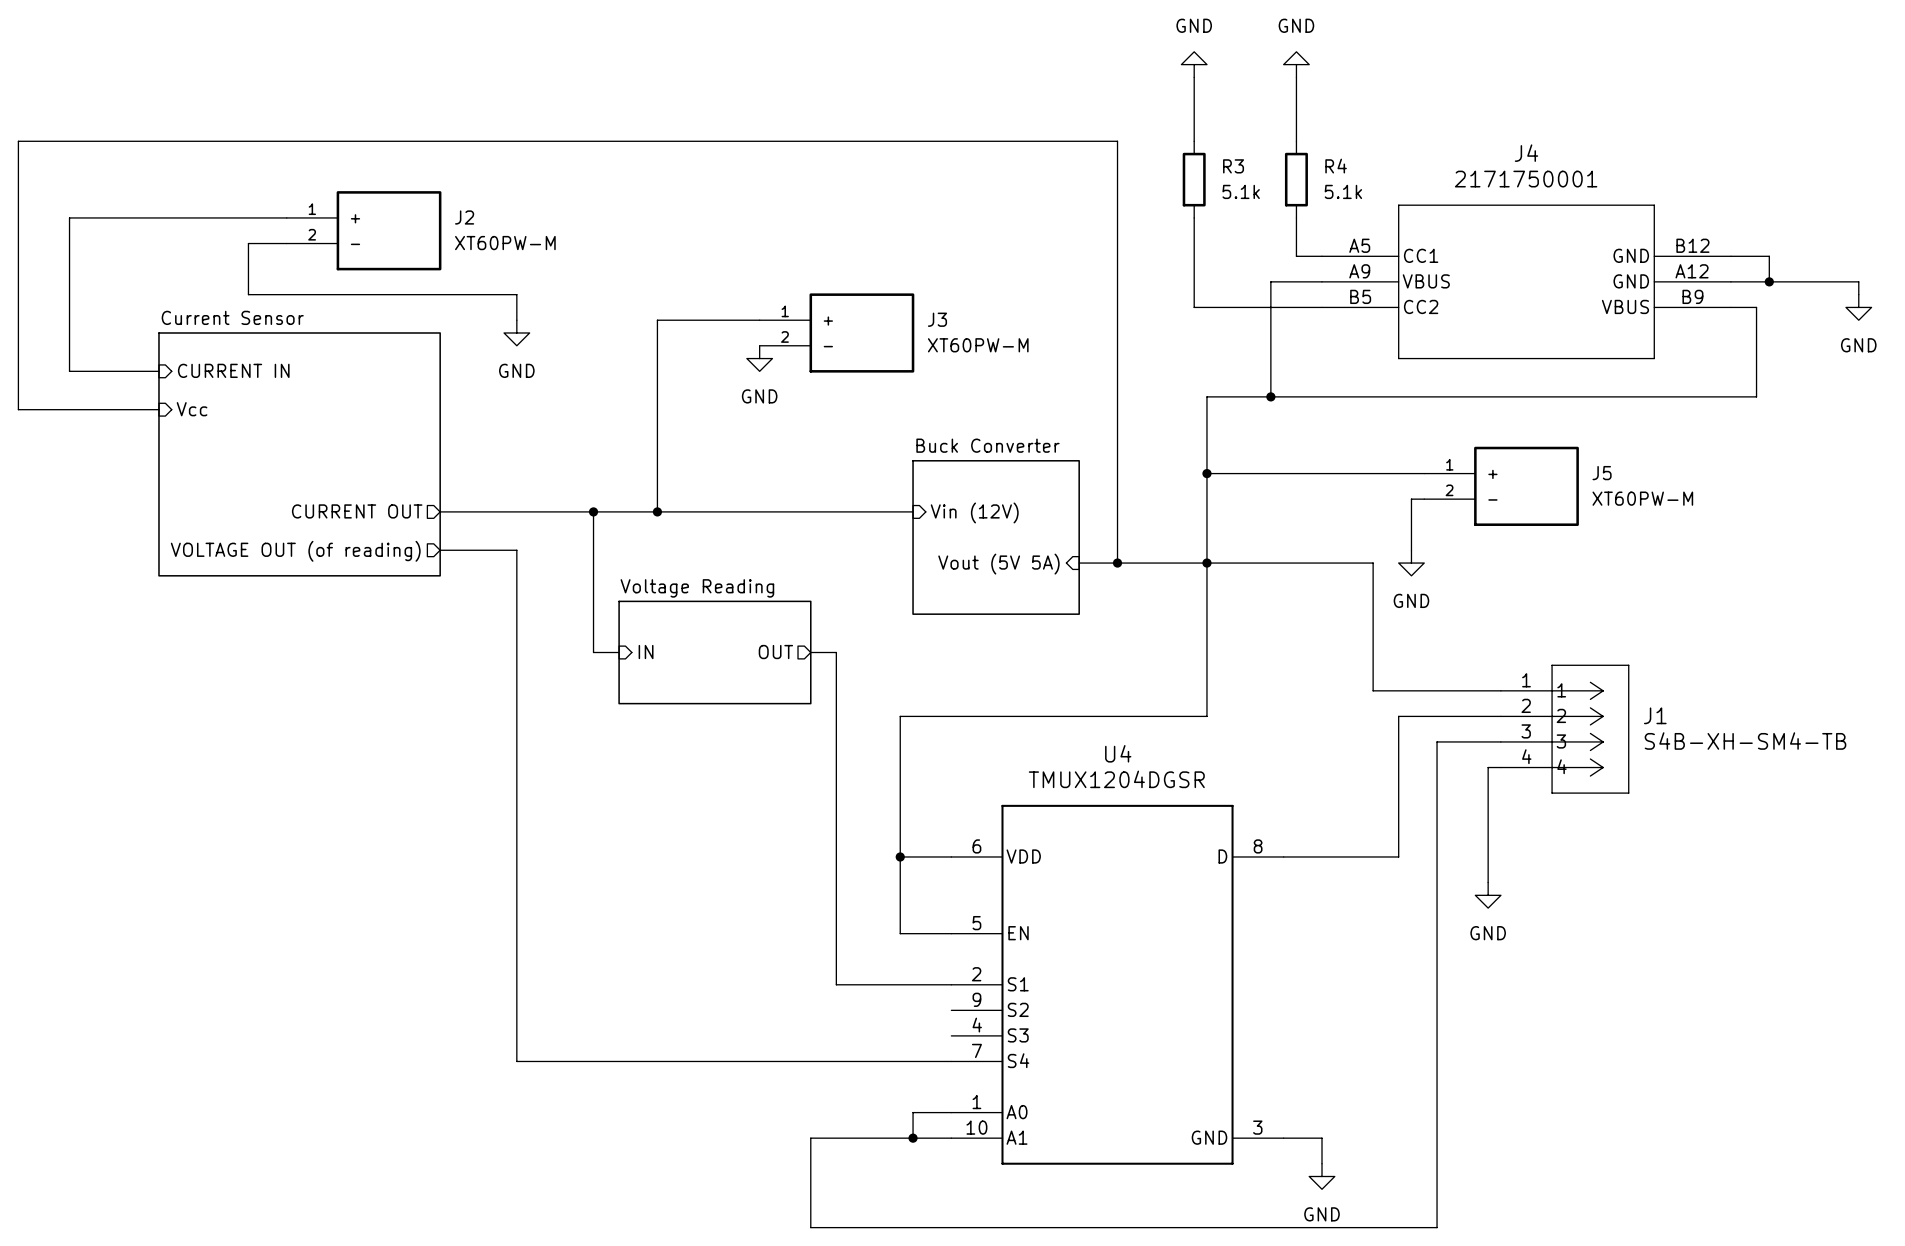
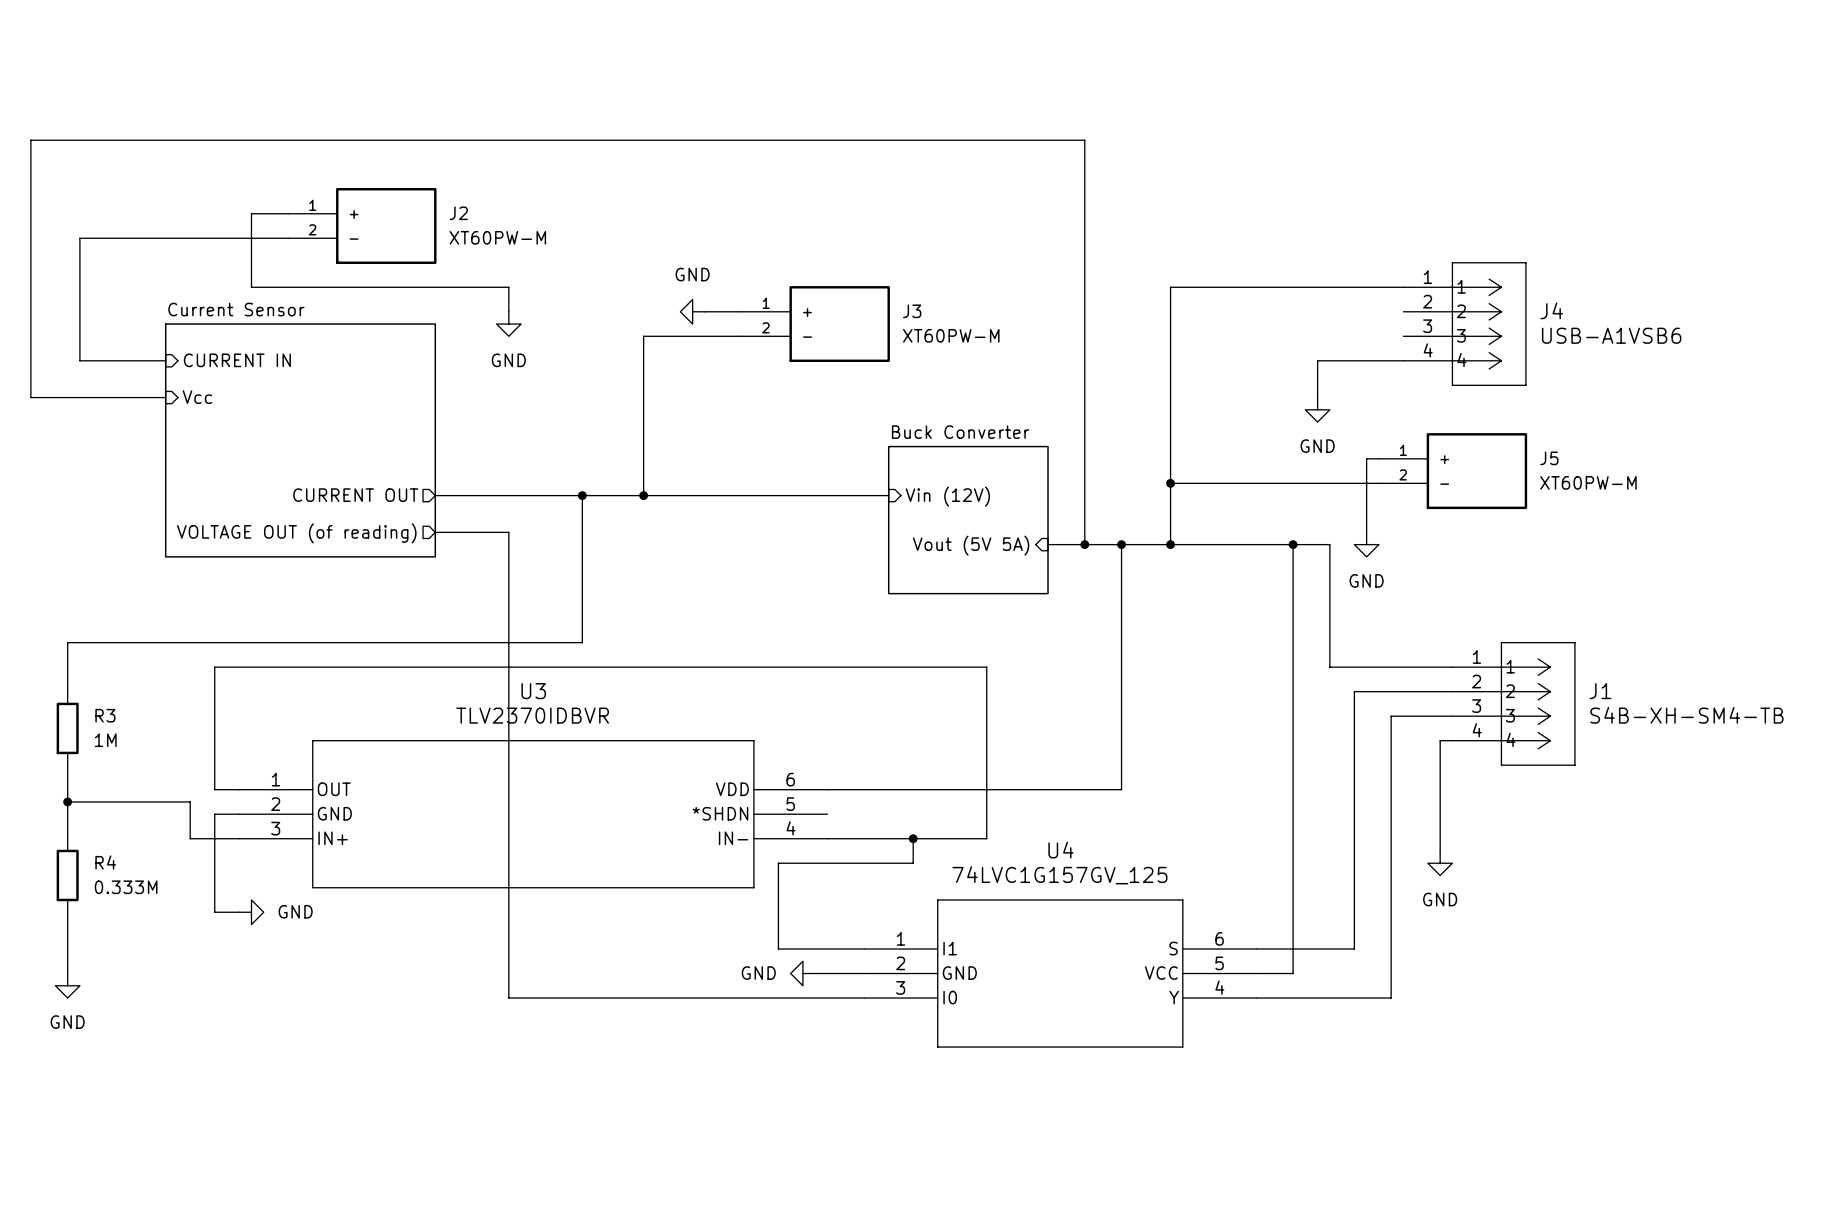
power symbol: GND (1194, 64) -> none
power symbol: GND (1296, 64) -> none
wire: (1194, 77) (1194, 141) -> none
wire: (1296, 77) (1296, 141) -> none
J4 name position: J4 (1526, 153) -> J4 (1551, 310)
R3 position: (1194, 179) -> (67, 728)
R4 position: (1296, 179) -> (67, 875)
J4 value: 2171750001 (1526, 179) -> USB-A1VSB6 (1611, 335)
R3 value: 5.1k (1241, 191) -> 1M (105, 740)
R4 value: 5.1k (1343, 191) -> 0.333M (126, 887)
J4 symbol: [1322, 204, 1731, 360] -> [1403, 262, 1527, 386]
wire: (248, 217) (69, 217) (69, 243) -> (251, 213) (251, 238) (79, 238)
wire: (1194, 217) (1194, 307) (1322, 307) -> none
wire: (1296, 217) (1296, 256) (1322, 256) -> none
wire: (1730, 256) (1769, 256) (1769, 281) -> none
wire: (1322, 281) (1270, 281) (1270, 396) -> none
wire: (1730, 281) (1858, 281) (1858, 294) -> none
junction: (1769, 281) -> none
wire: (1730, 307) (1756, 307) (1756, 396) (1206, 396) -> (1403, 287) (1170, 287) (1170, 385)
power symbol: GND (1858, 307) -> none
wire: (721, 320) (657, 320) (657, 345) -> (741, 336) (643, 336)
power symbol rotation: 0° (759, 358) -> 90° clockwise (692, 311)
power symbol position: GND (759, 358) -> GND (692, 311)
wire: none -> (1403, 360) (1317, 360) (1317, 397)
power symbol text position: GND (759, 396) -> GND (692, 274)
junction: (1270, 396) -> none
power symbol: none -> GND (1317, 409)
wire: (1206, 473) (1411, 473) -> (1170, 483) (1366, 483) (1366, 458)
junction position: (1206, 473) -> (1170, 483)
wire: none -> (1121, 544) (1121, 789) (827, 789)
junction: none -> (1121, 544)
wire: (1206, 563) (1206, 716) (900, 716) (900, 933) (951, 933) -> none
wire: none -> (1293, 544) (1293, 973) (1256, 973)
junction: none -> (1293, 544)
wire: (593, 652) (619, 652) -> (582, 630) (582, 642) (67, 642) (67, 691)
sheet pin: IN (646, 652) -> none
sheet Voltage Reading: (714, 652) -> none
sheet pin: OUT (775, 652) -> none
wire: (810, 652) (836, 652) (836, 984) -> (913, 838) (913, 863) (778, 863) (778, 949) (815, 949)
U4 name position: U4 (1118, 753) -> U4 (1060, 850)
U4 value: TMUX1204DGSR (1116, 779) -> 74LVC1G157GV_125 (1059, 875)
wire: none -> (67, 765) (67, 838)
U4 symbol: [951, 804, 1284, 1165] -> [864, 899, 1257, 1048]
wire: none -> (239, 789) (214, 789) (214, 667) (986, 667) (986, 838) (827, 838)
wire: none -> (67, 801) (190, 801) (190, 838) (239, 838)
junction: none -> (67, 801)
wire: none -> (239, 814) (214, 814) (214, 912) (239, 912)
U3: none -> TLV2370IDBVR (533, 814)
wire: (900, 856) (951, 856) -> (815, 973) (864, 973)
junction position: (900, 856) -> (913, 838)
wire: (1283, 856) (1398, 856) -> (1256, 949) (1354, 949) (1354, 826)
wire: none -> (67, 912) (67, 973)
power symbol: none -> GND (251, 912)
power symbol: none -> GND (802, 973)
power symbol: none -> GND (67, 985)
wire: (516, 1035) (516, 1061) (951, 1061) -> (508, 998) (864, 998)
wire: (1437, 1035) (1437, 1227) (810, 1227) (810, 1138) (951, 1138) -> (1391, 998) (1256, 998)
wire: (951, 1112) (913, 1112) (913, 1138) -> none
junction: (913, 1138) -> none
wire: (1283, 1138) (1322, 1138) (1322, 1163) -> none
power symbol: GND (1322, 1176) -> none

